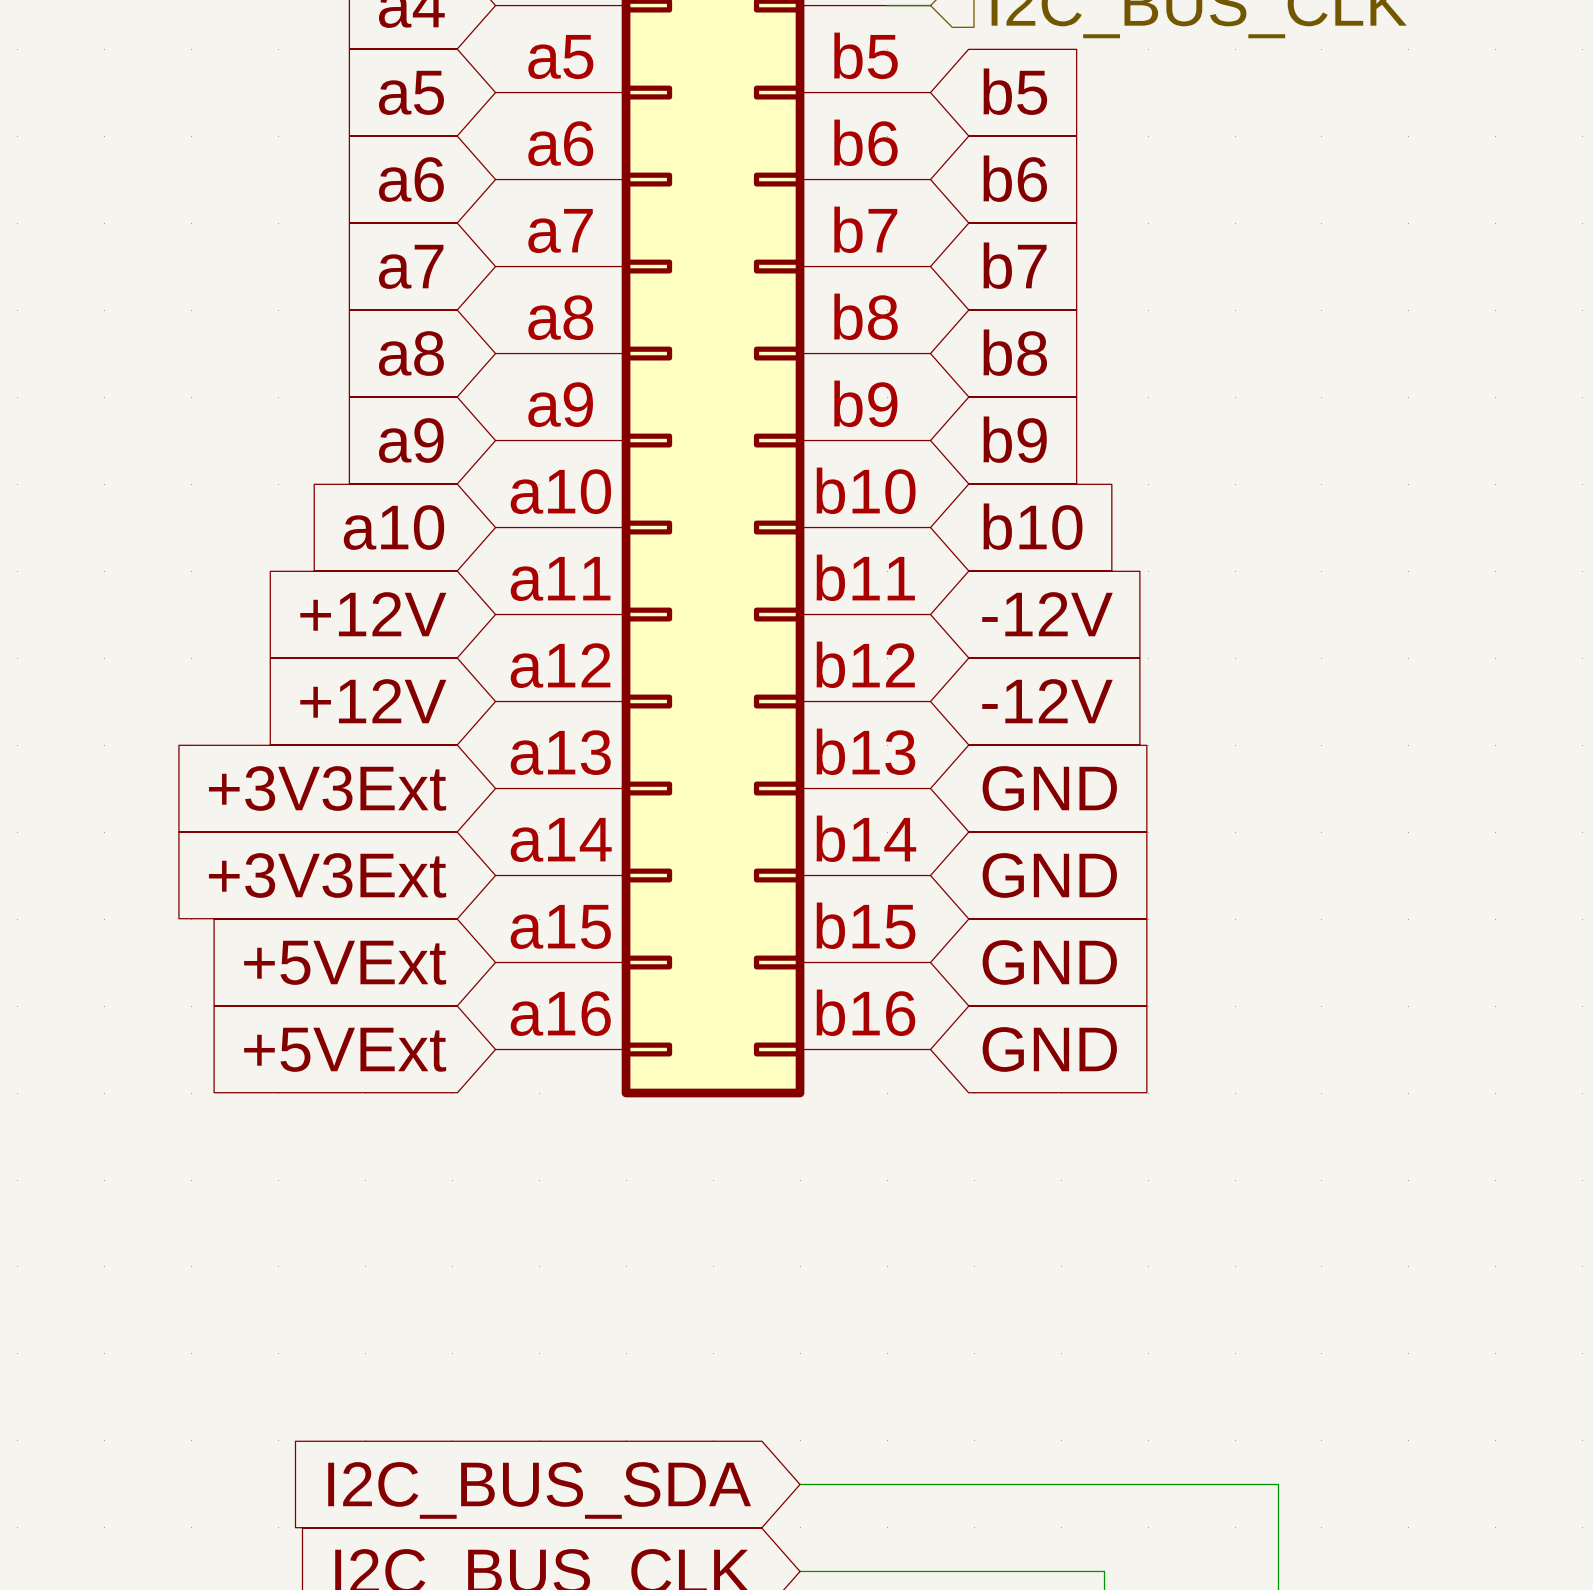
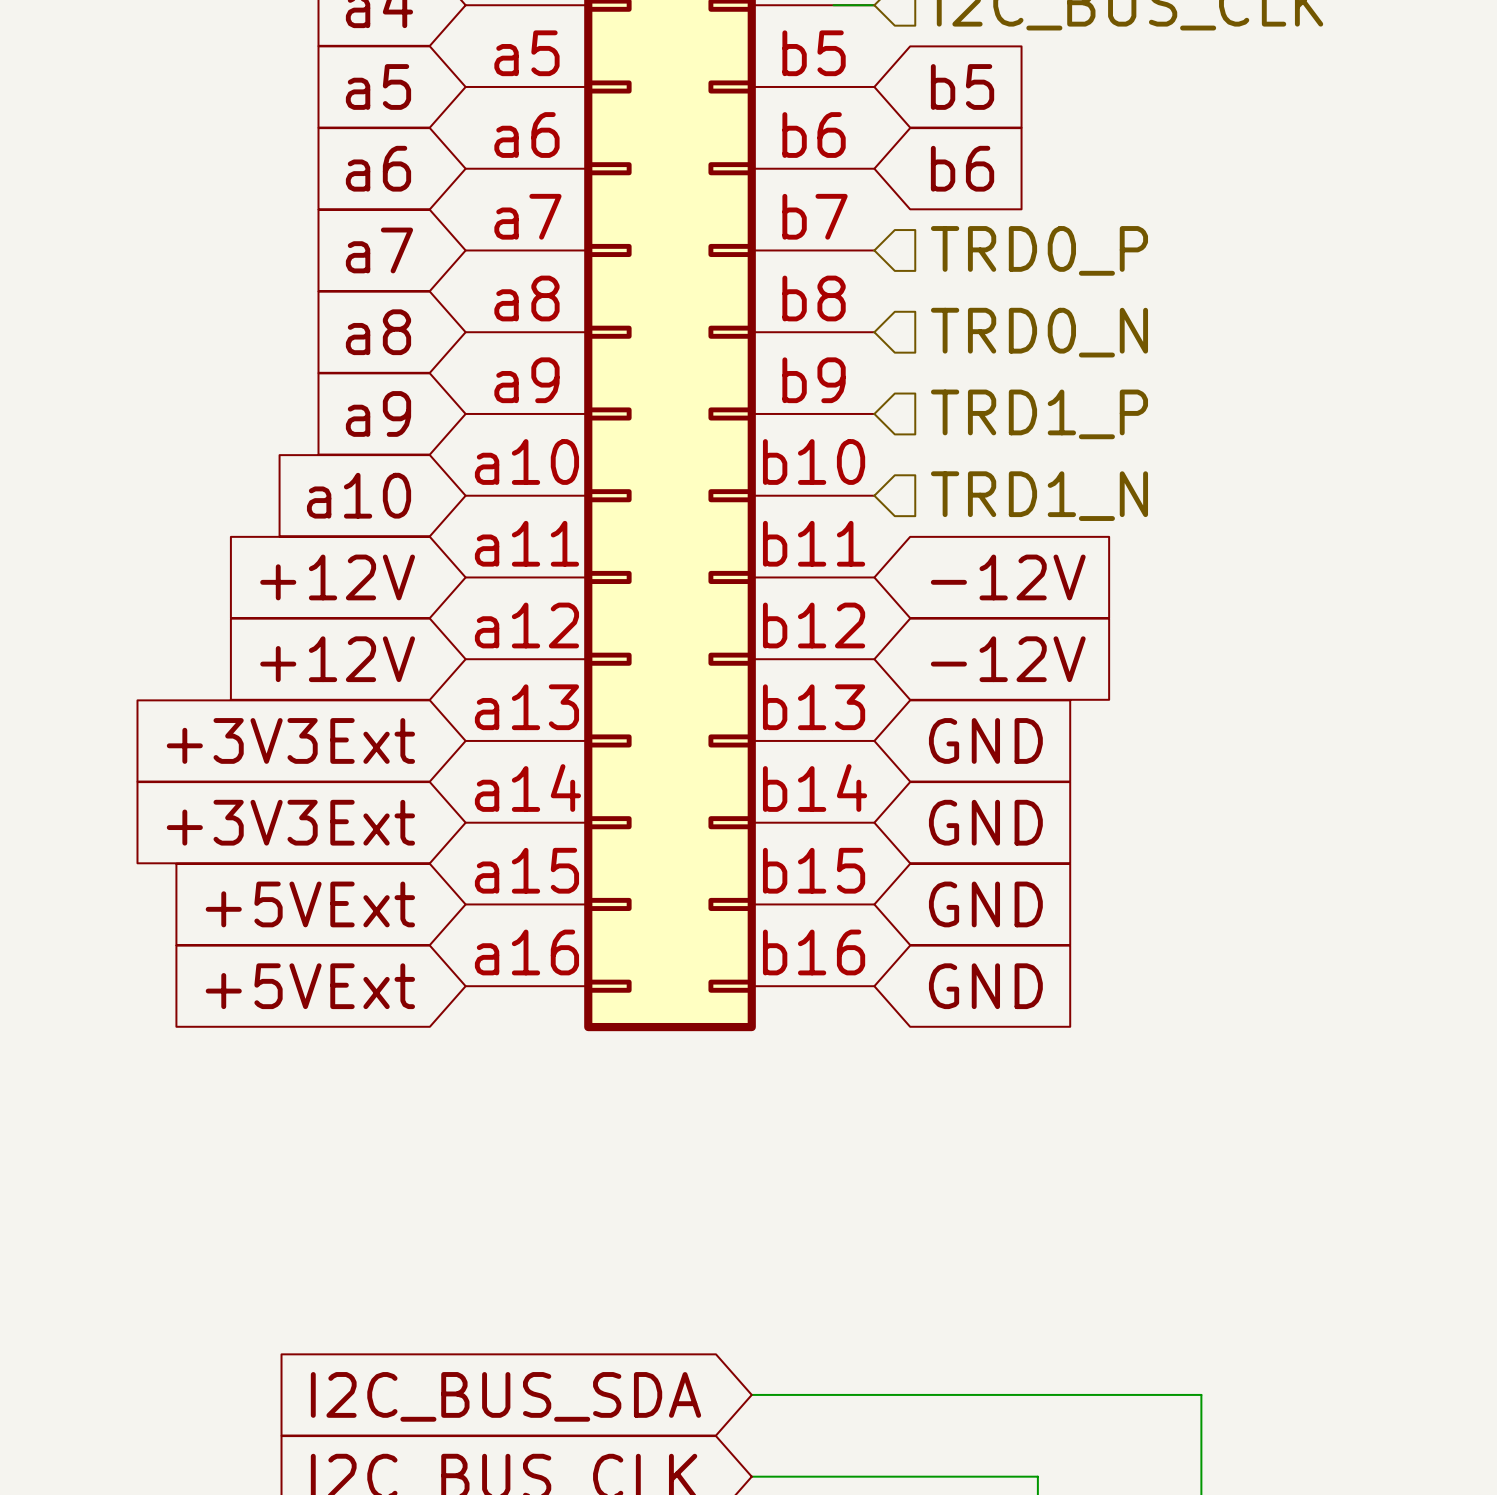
global label: b7 (1015, 265) -> none
hierarchical label: none -> TRD0_P (1039, 250)
global label: b8 (1015, 352) -> none
hierarchical label: none -> TRD0_N (1039, 332)
global label: b9 (1015, 439) -> none
hierarchical label: none -> TRD1_P (1039, 414)
global label: b10 (1033, 526) -> none
hierarchical label: none -> TRD1_N (1039, 496)

